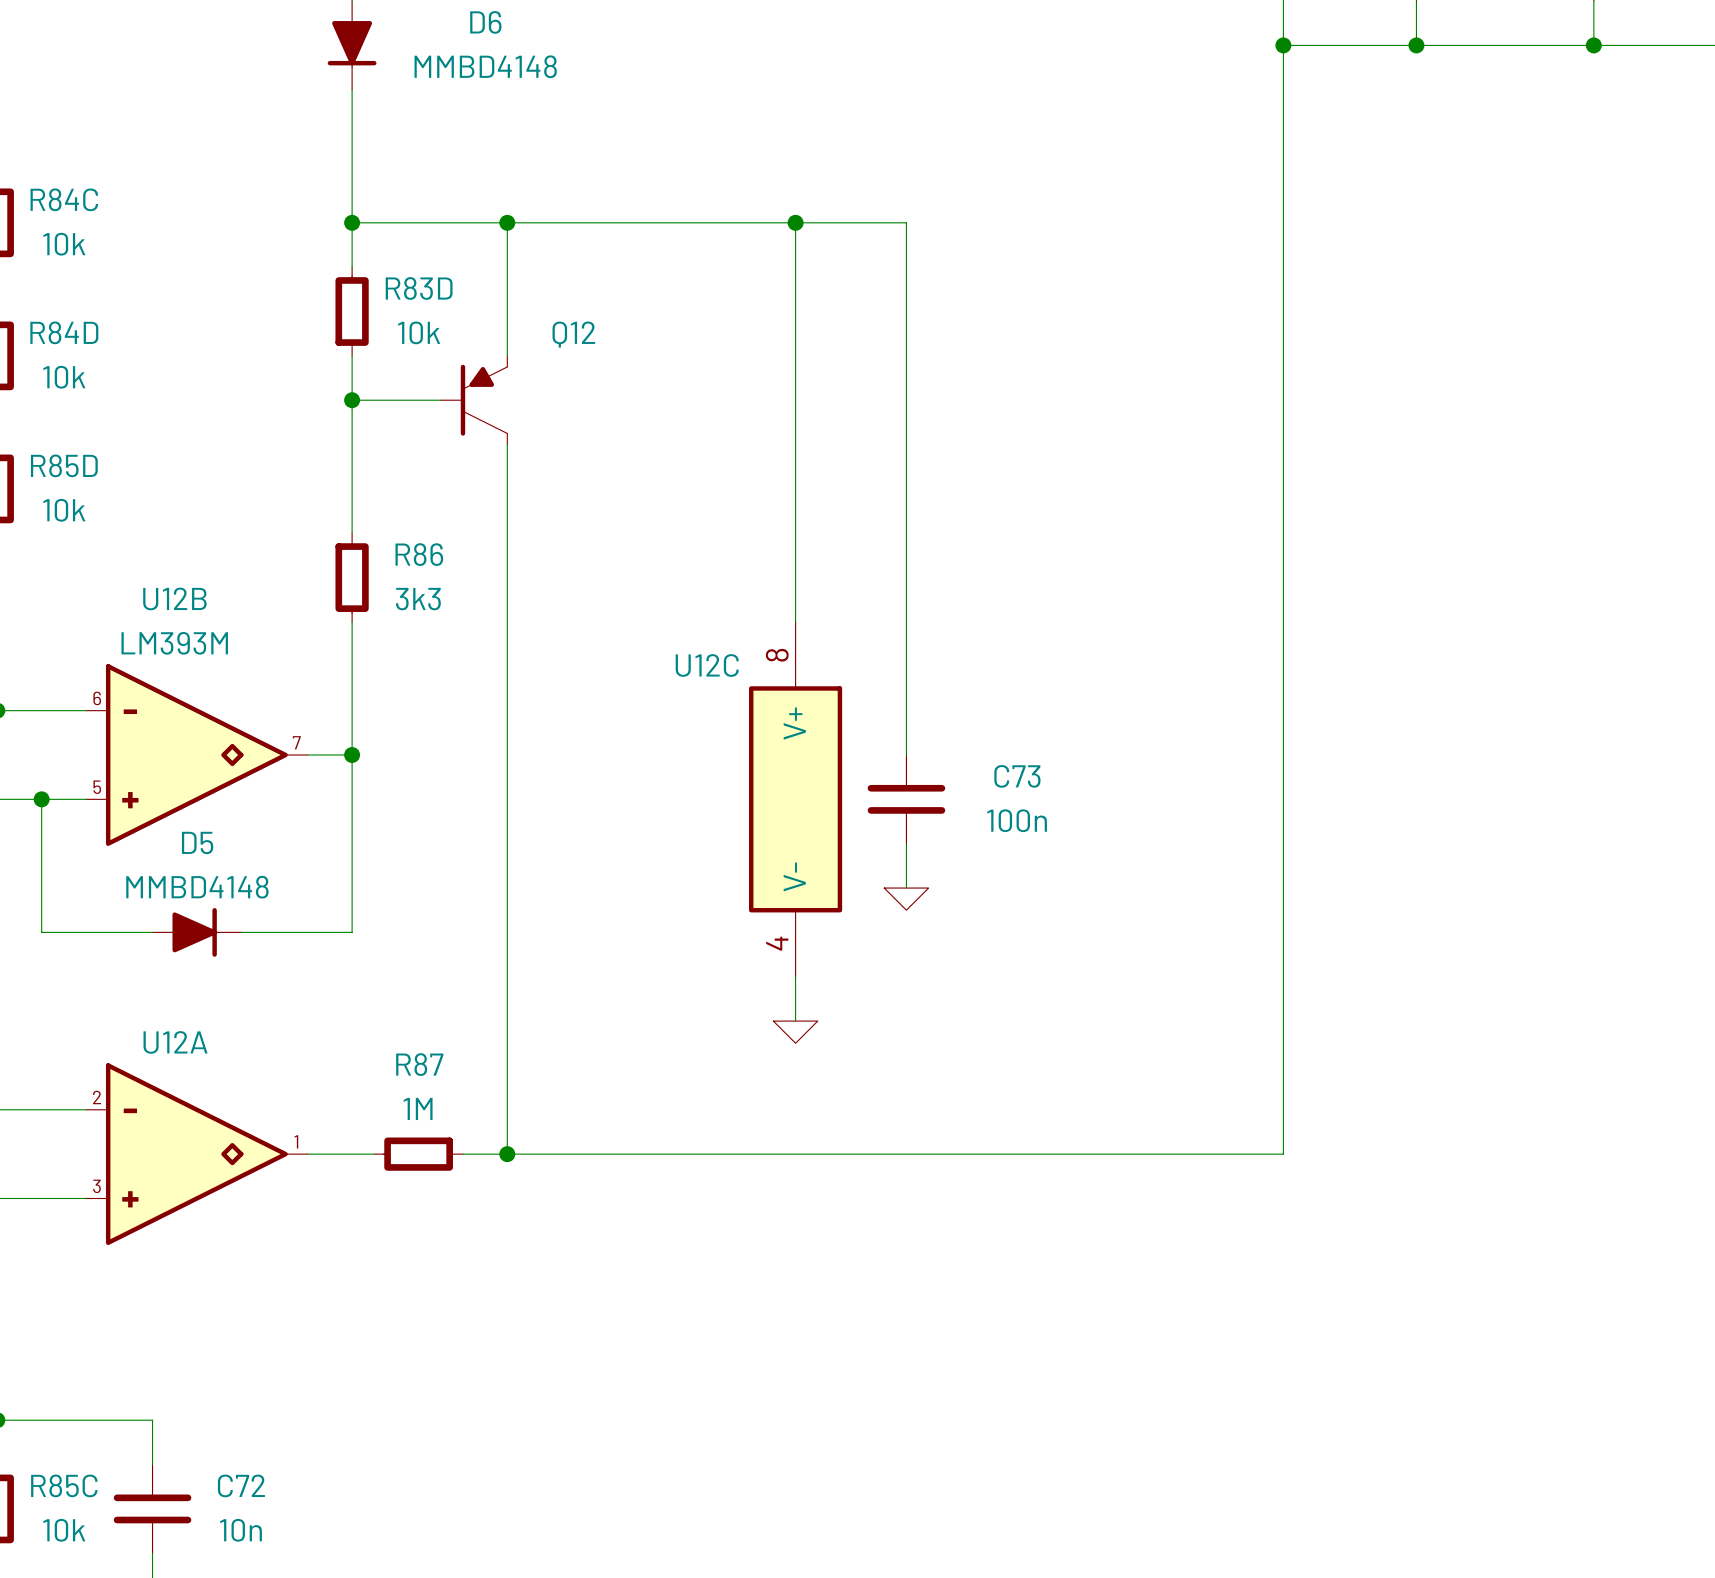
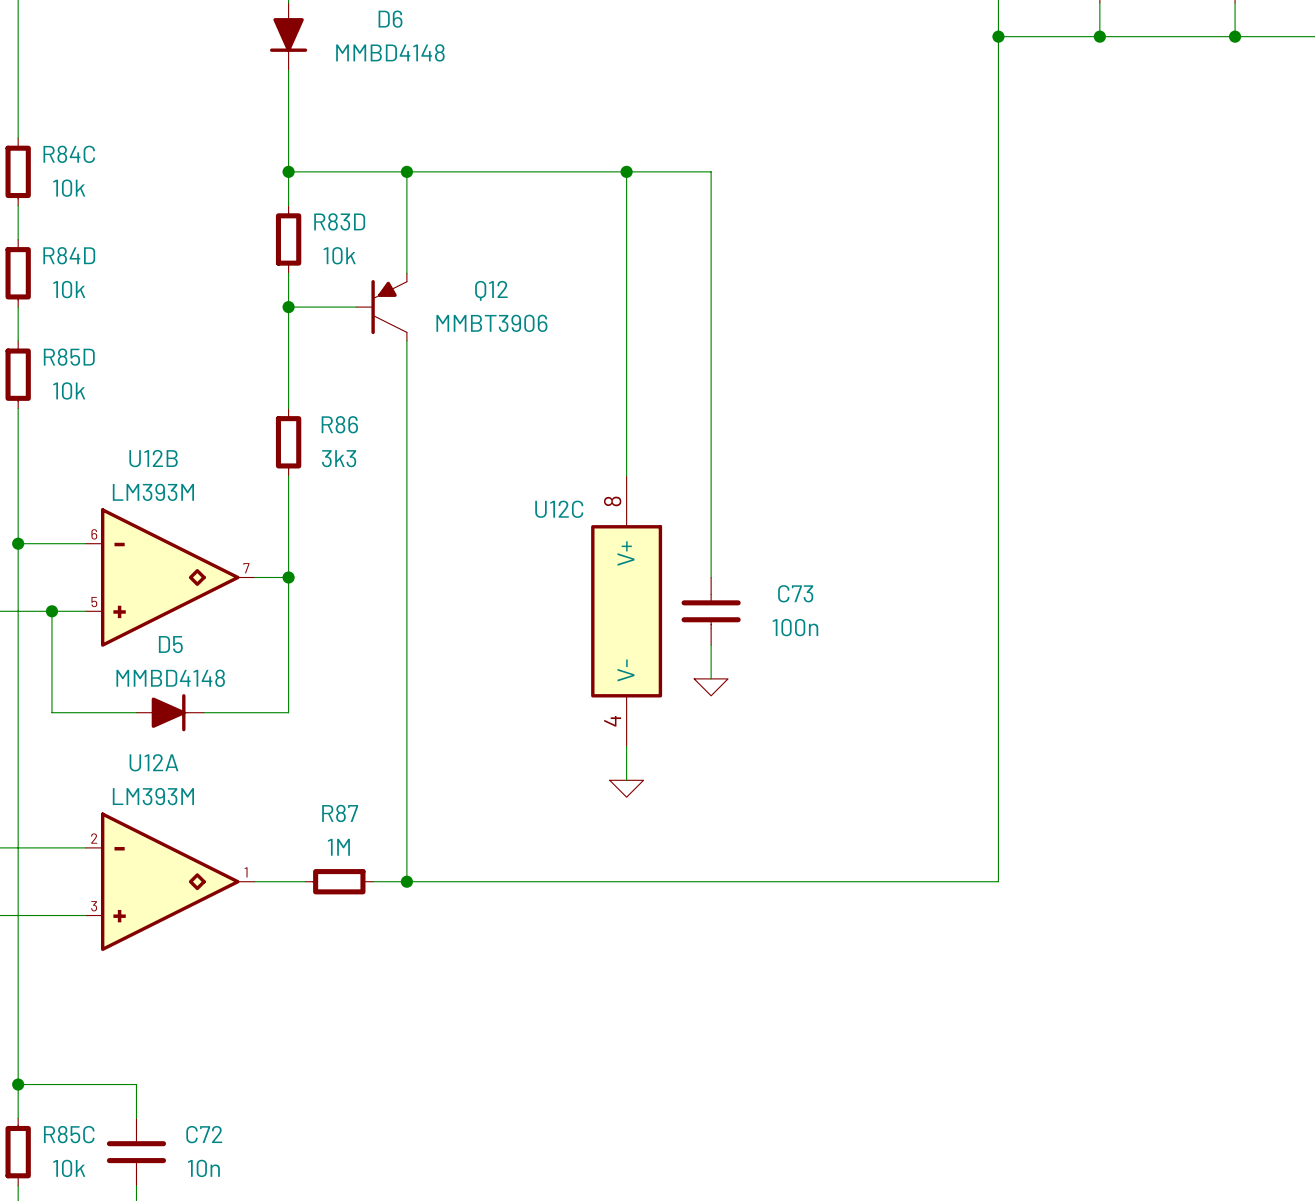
Q12 name position: Q12 (573, 334) -> Q12 (491, 290)
Q12 value: none -> MMBT3906 (491, 323)
U12A value: none -> LM393M (153, 796)
U12A name position: U12A (175, 1042) -> U12A (154, 762)

